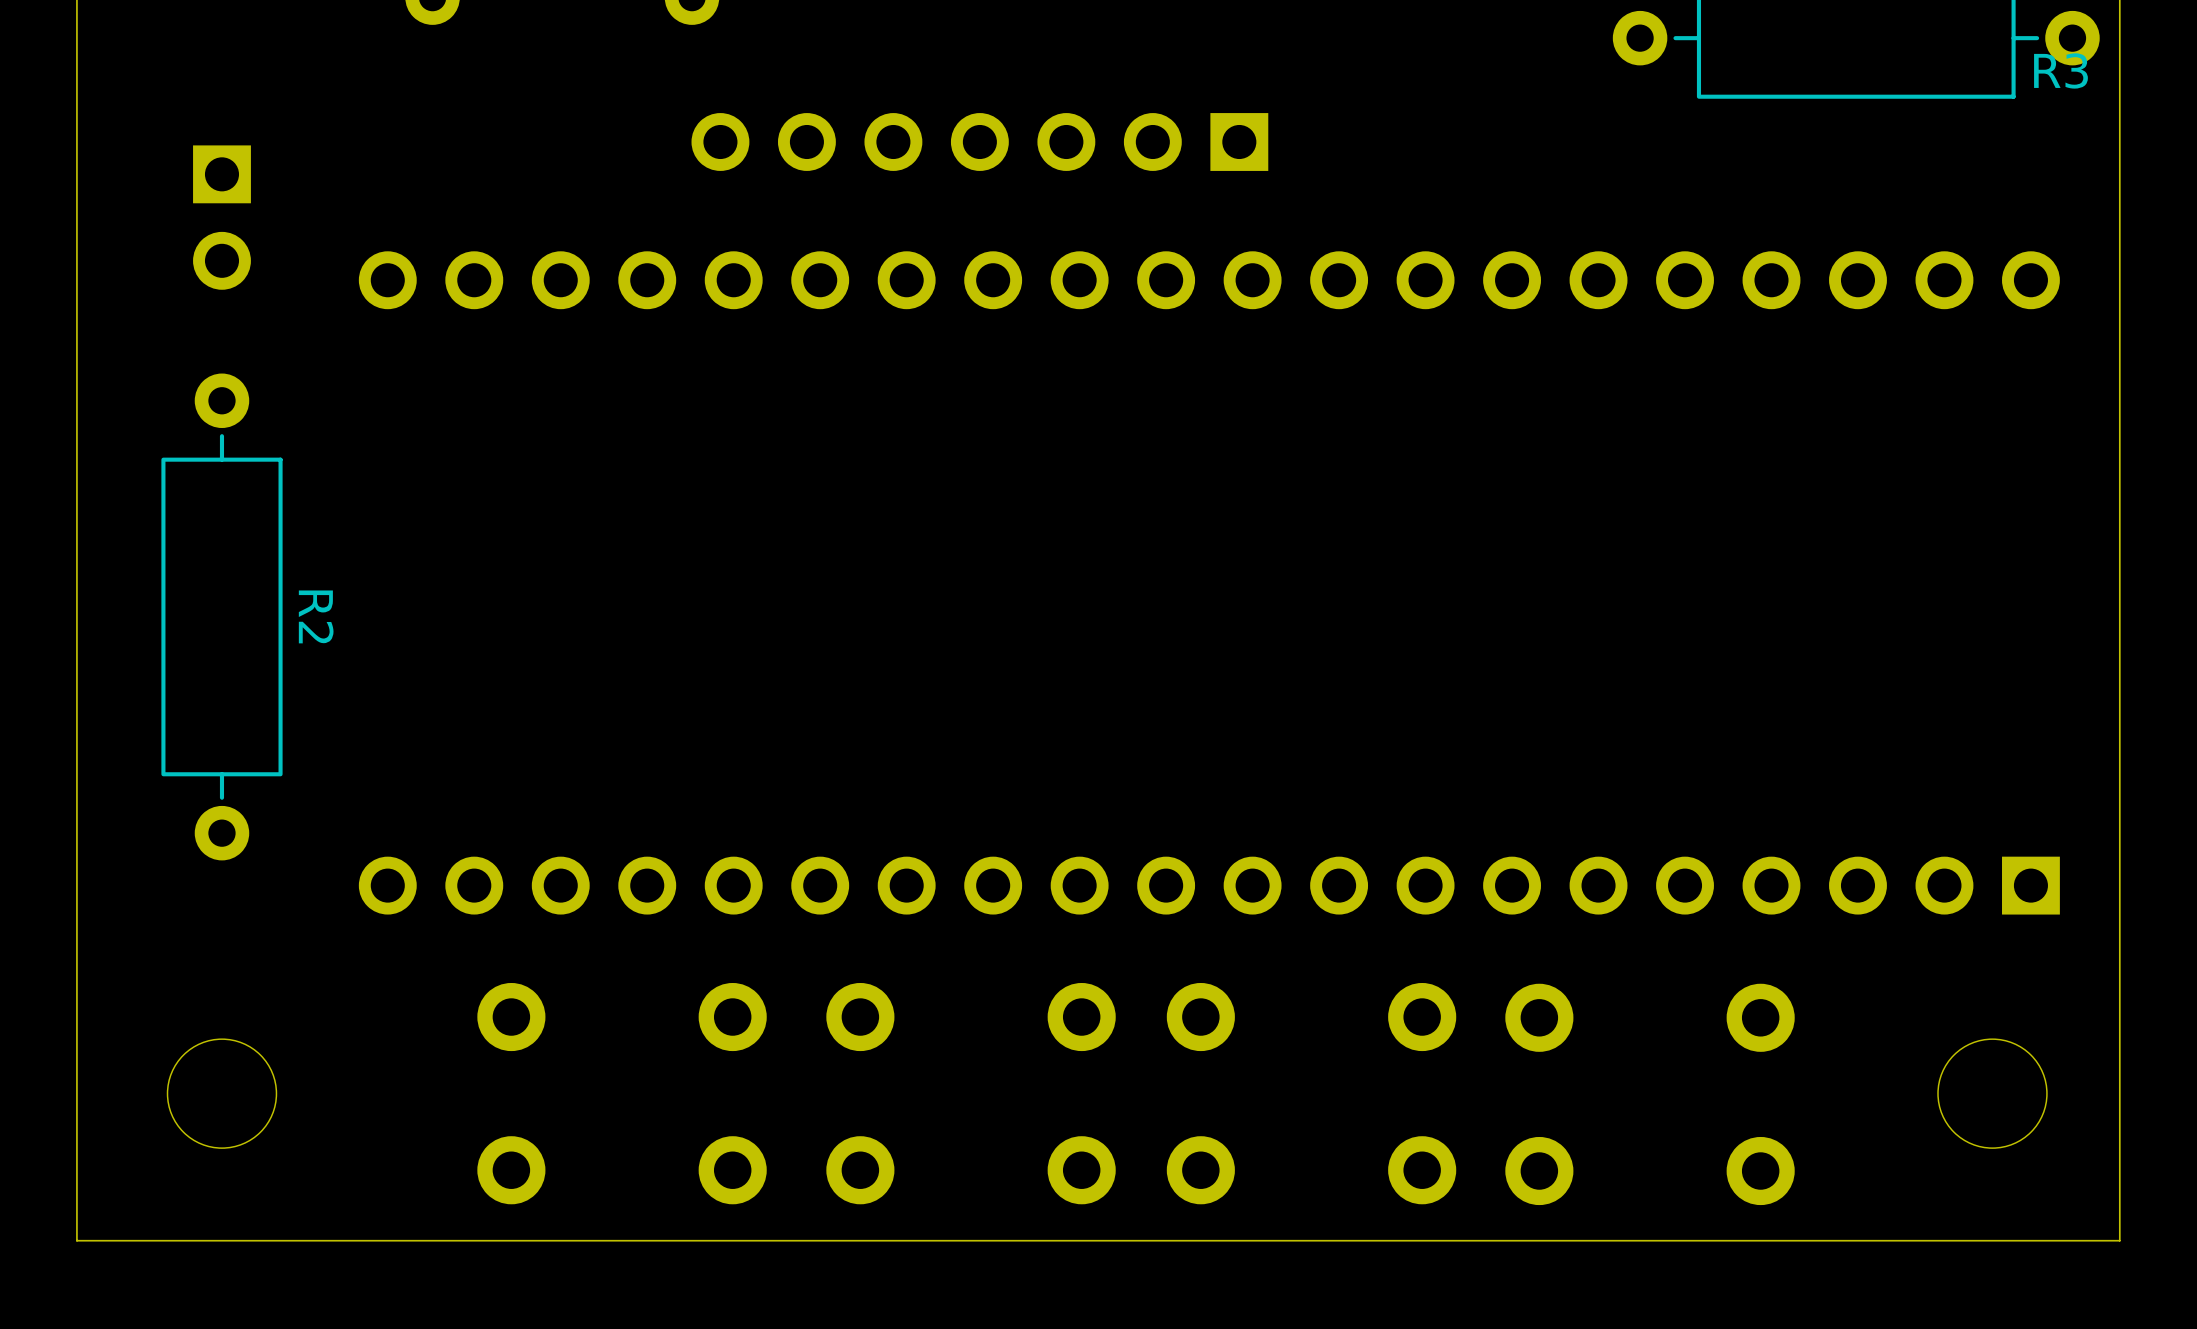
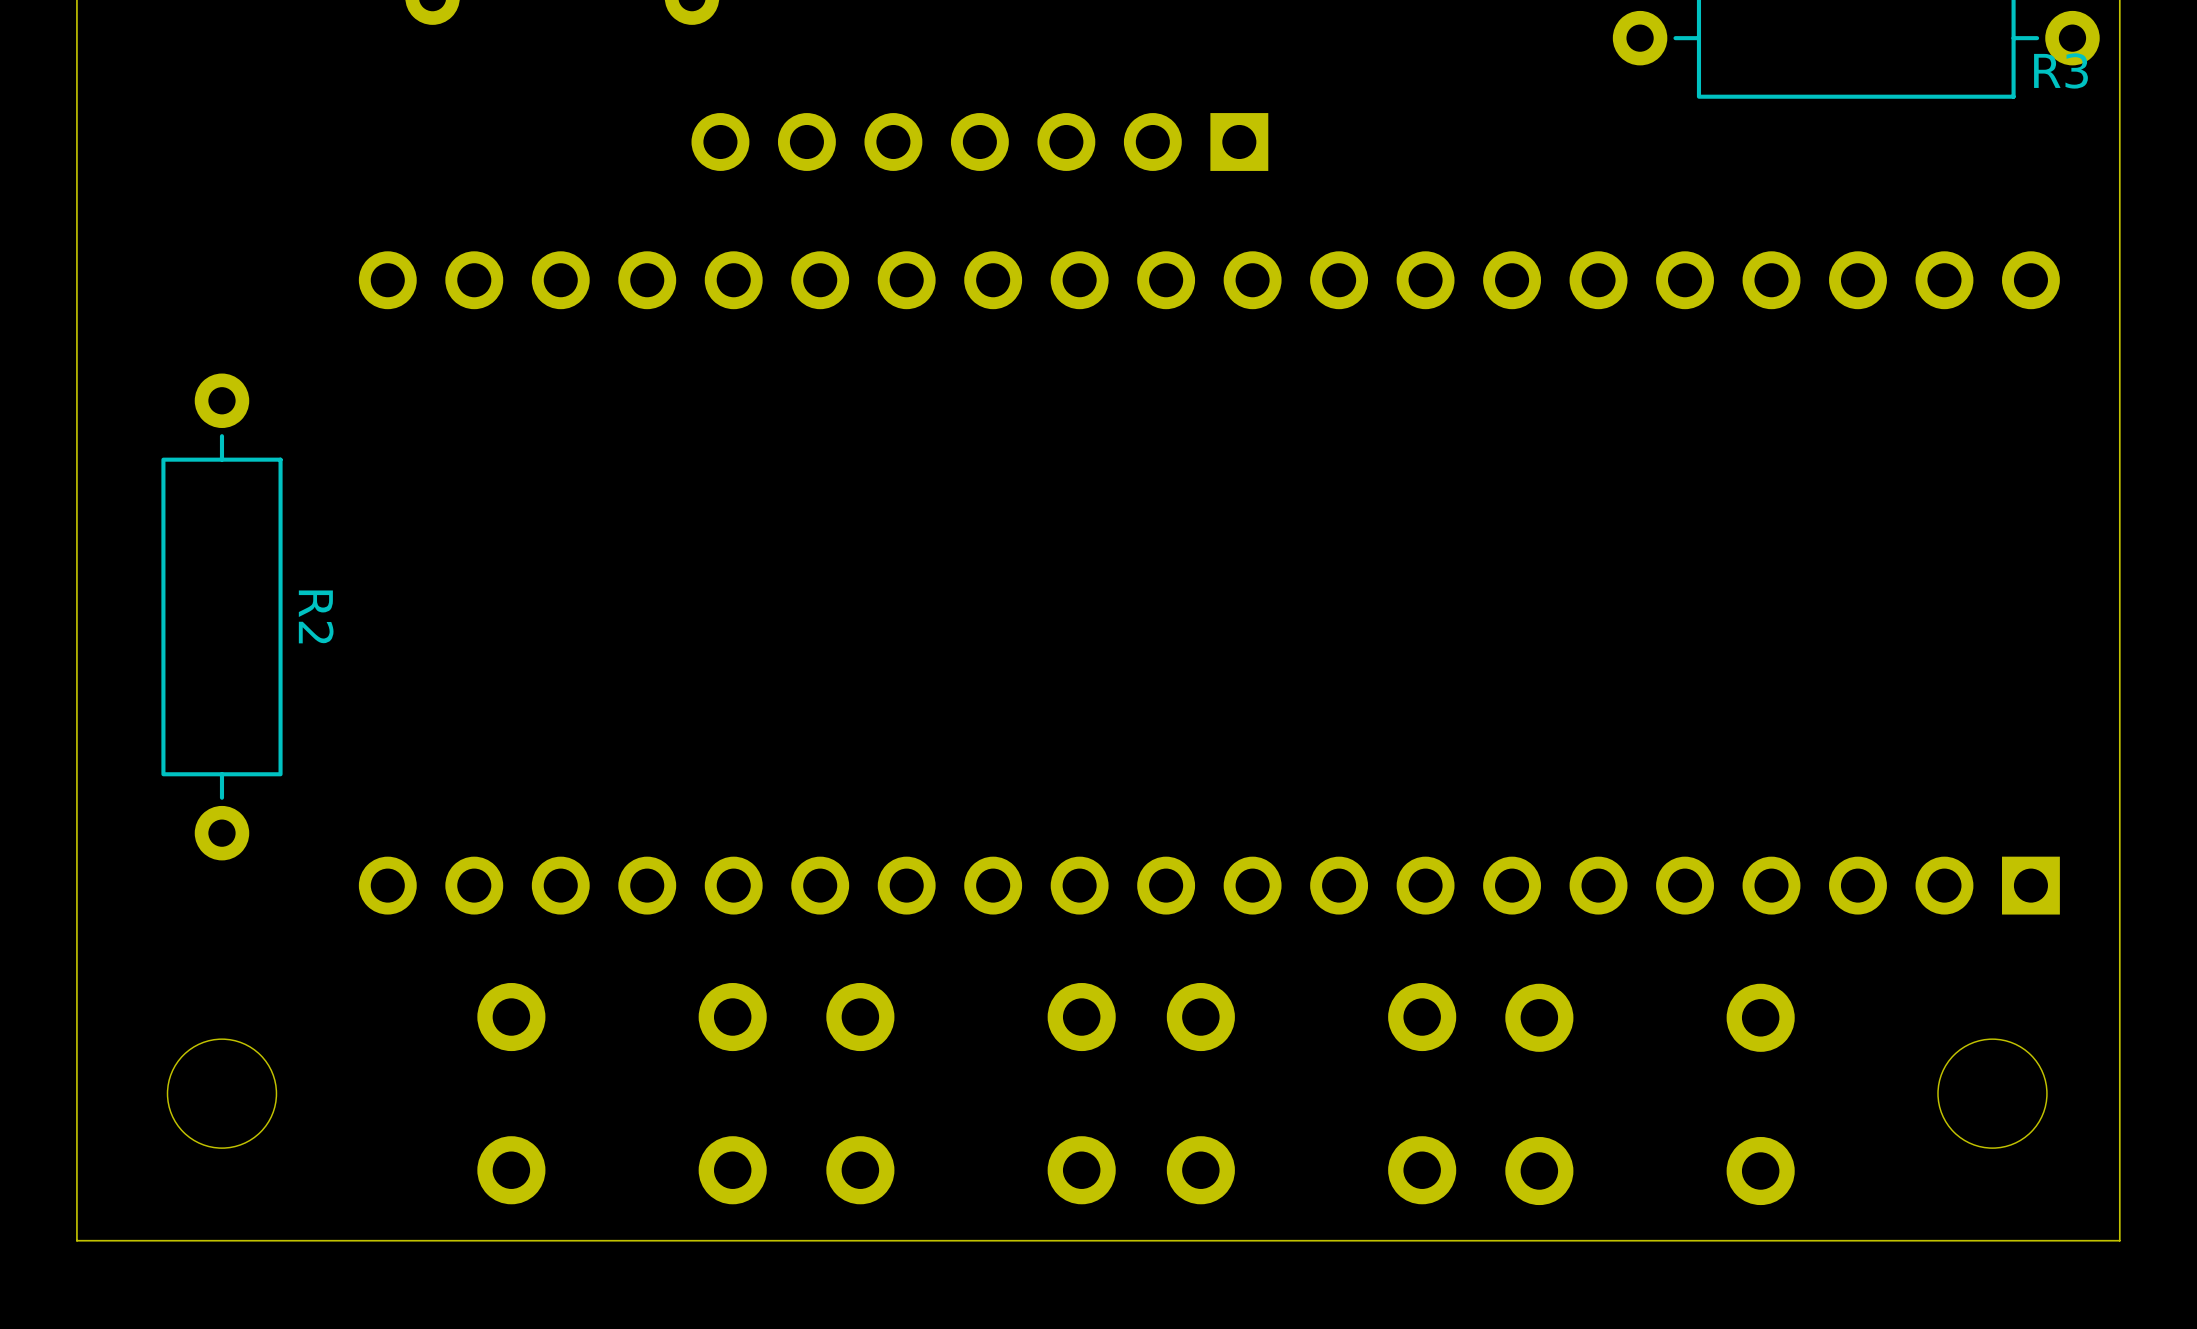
part: (221, 217) -> none

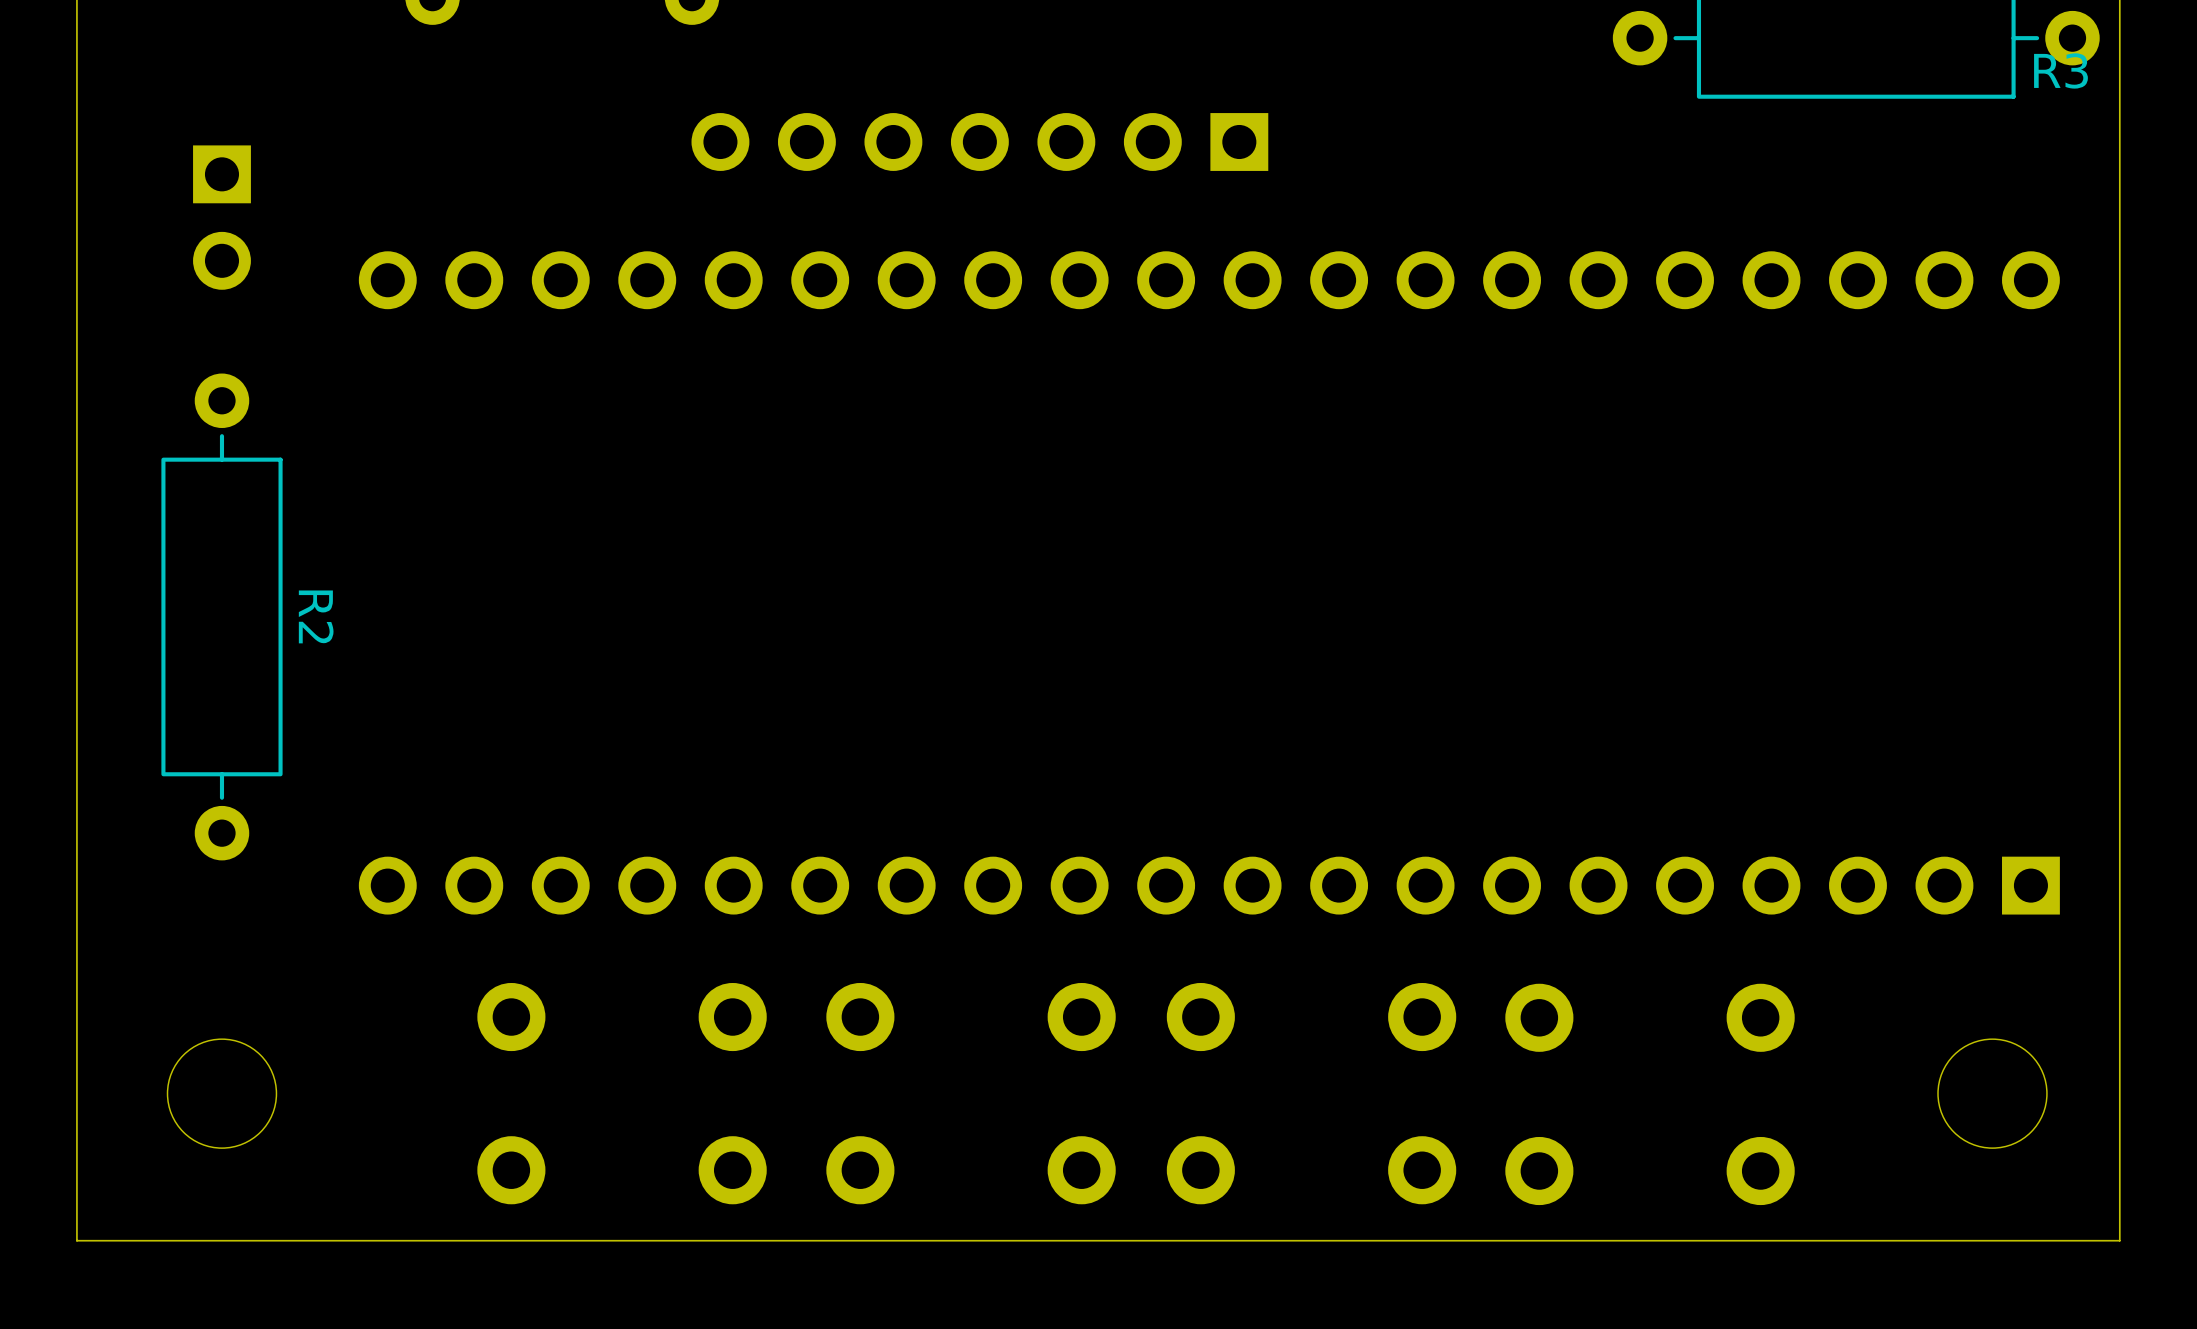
part: none -> (221, 217)

